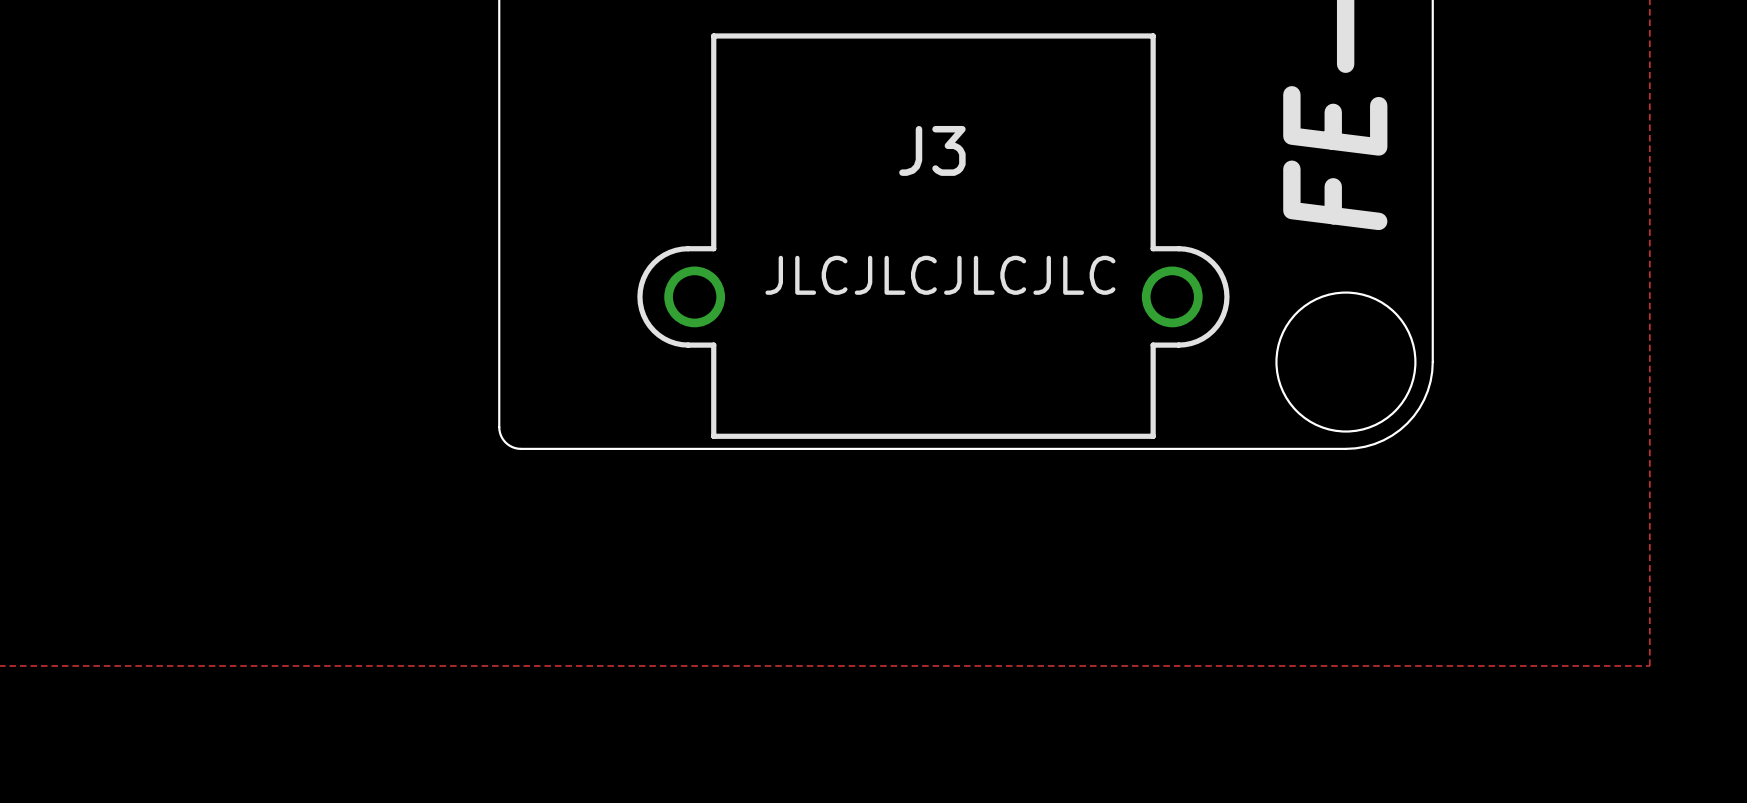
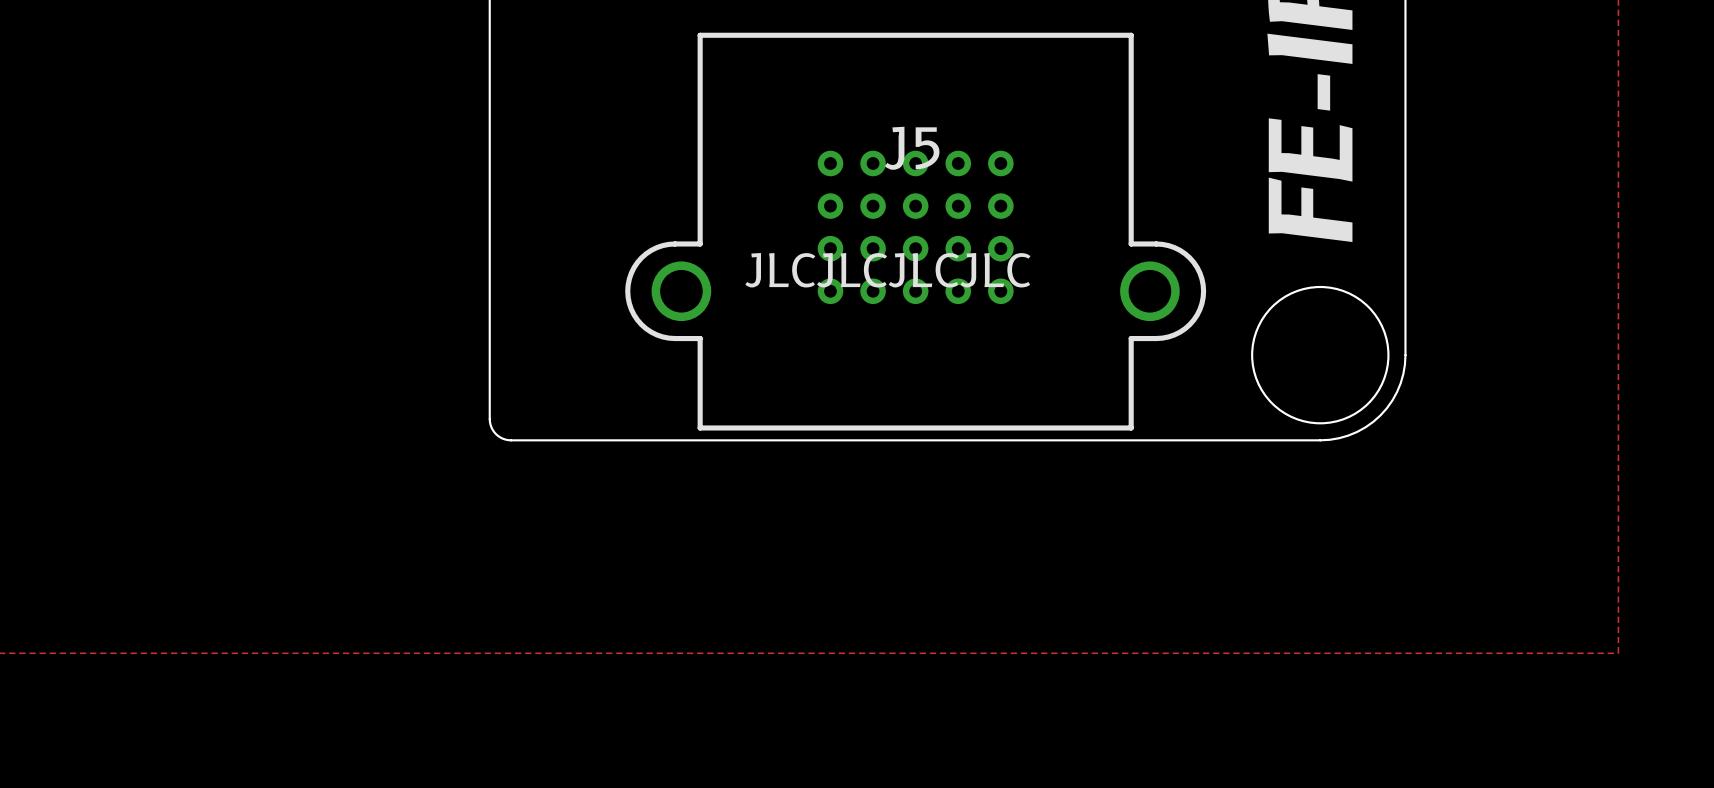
J3 name: J3 (932, 150) -> J5 (912, 148)
via: none -> (830, 163)
via: none -> (873, 163)
via: none -> (915, 163)
via: none -> (958, 163)
via: none -> (1000, 163)
via: none -> (830, 206)
via: none -> (873, 206)
via: none -> (915, 206)
via: none -> (958, 206)
via: none -> (1000, 206)
via: none -> (830, 248)
via: none -> (873, 248)
via: none -> (915, 248)
via: none -> (958, 248)
via: none -> (1000, 248)
via: none -> (830, 291)
via: none -> (873, 291)
via: none -> (915, 291)
via: none -> (958, 291)
via: none -> (1000, 291)

